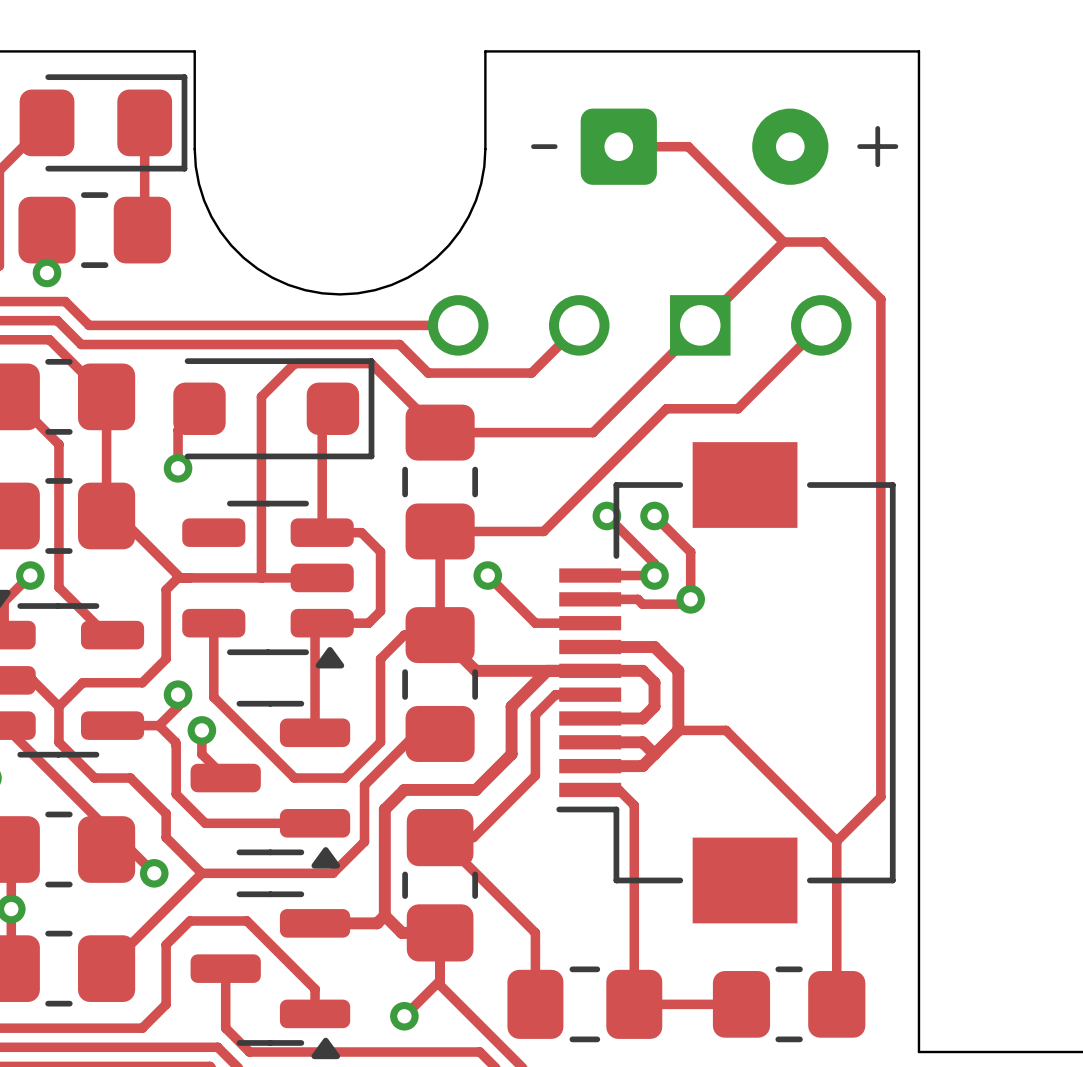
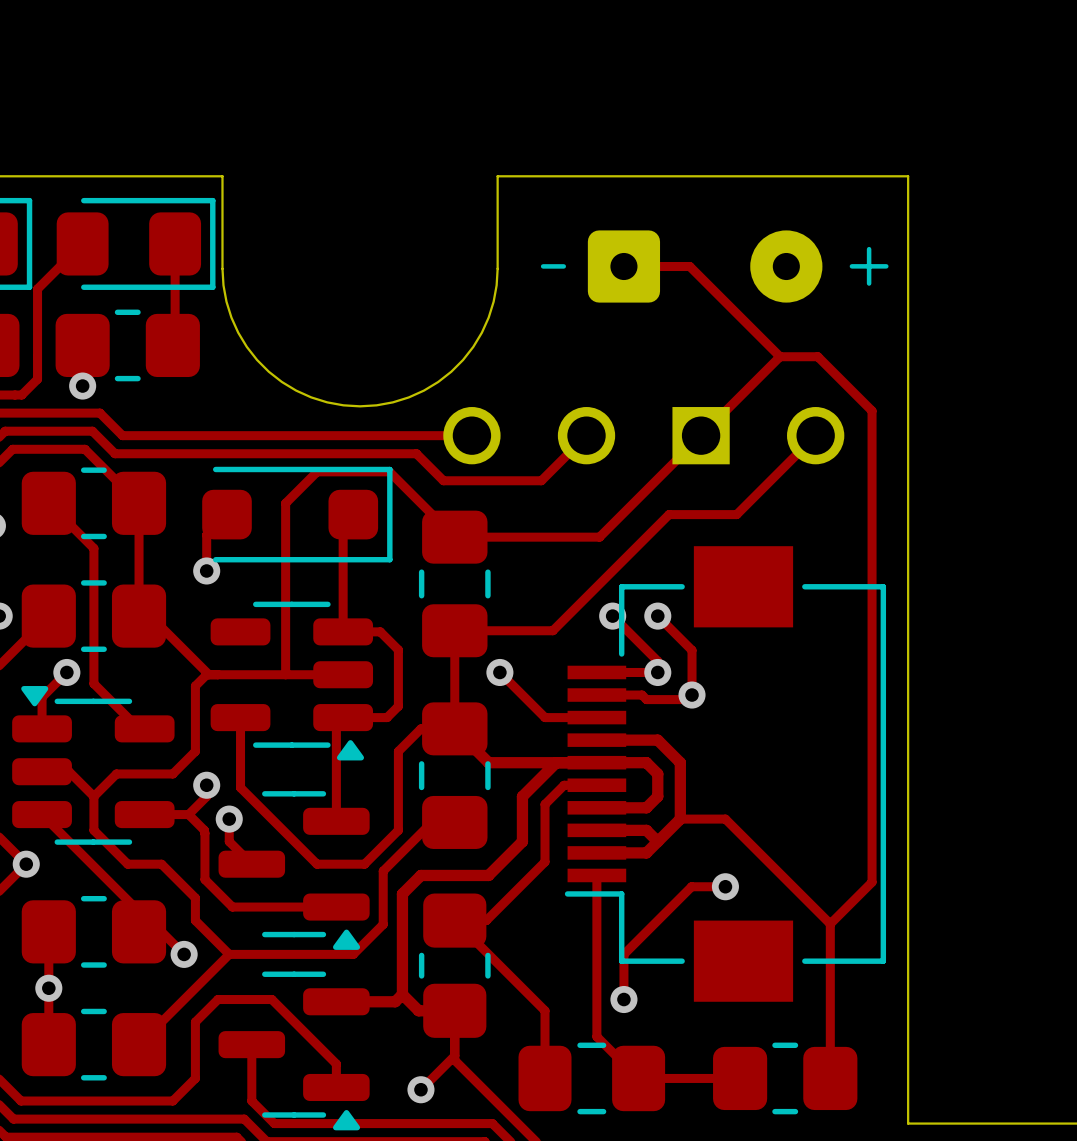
track: (590, 789) (618, 789) (634, 805) (634, 1004) -> (596, 875) (596, 1036) (638, 1078)
track: none -> (725, 886) (691, 886) (623, 954) (623, 999)
via: none -> (725, 886)
via: none -> (623, 999)

